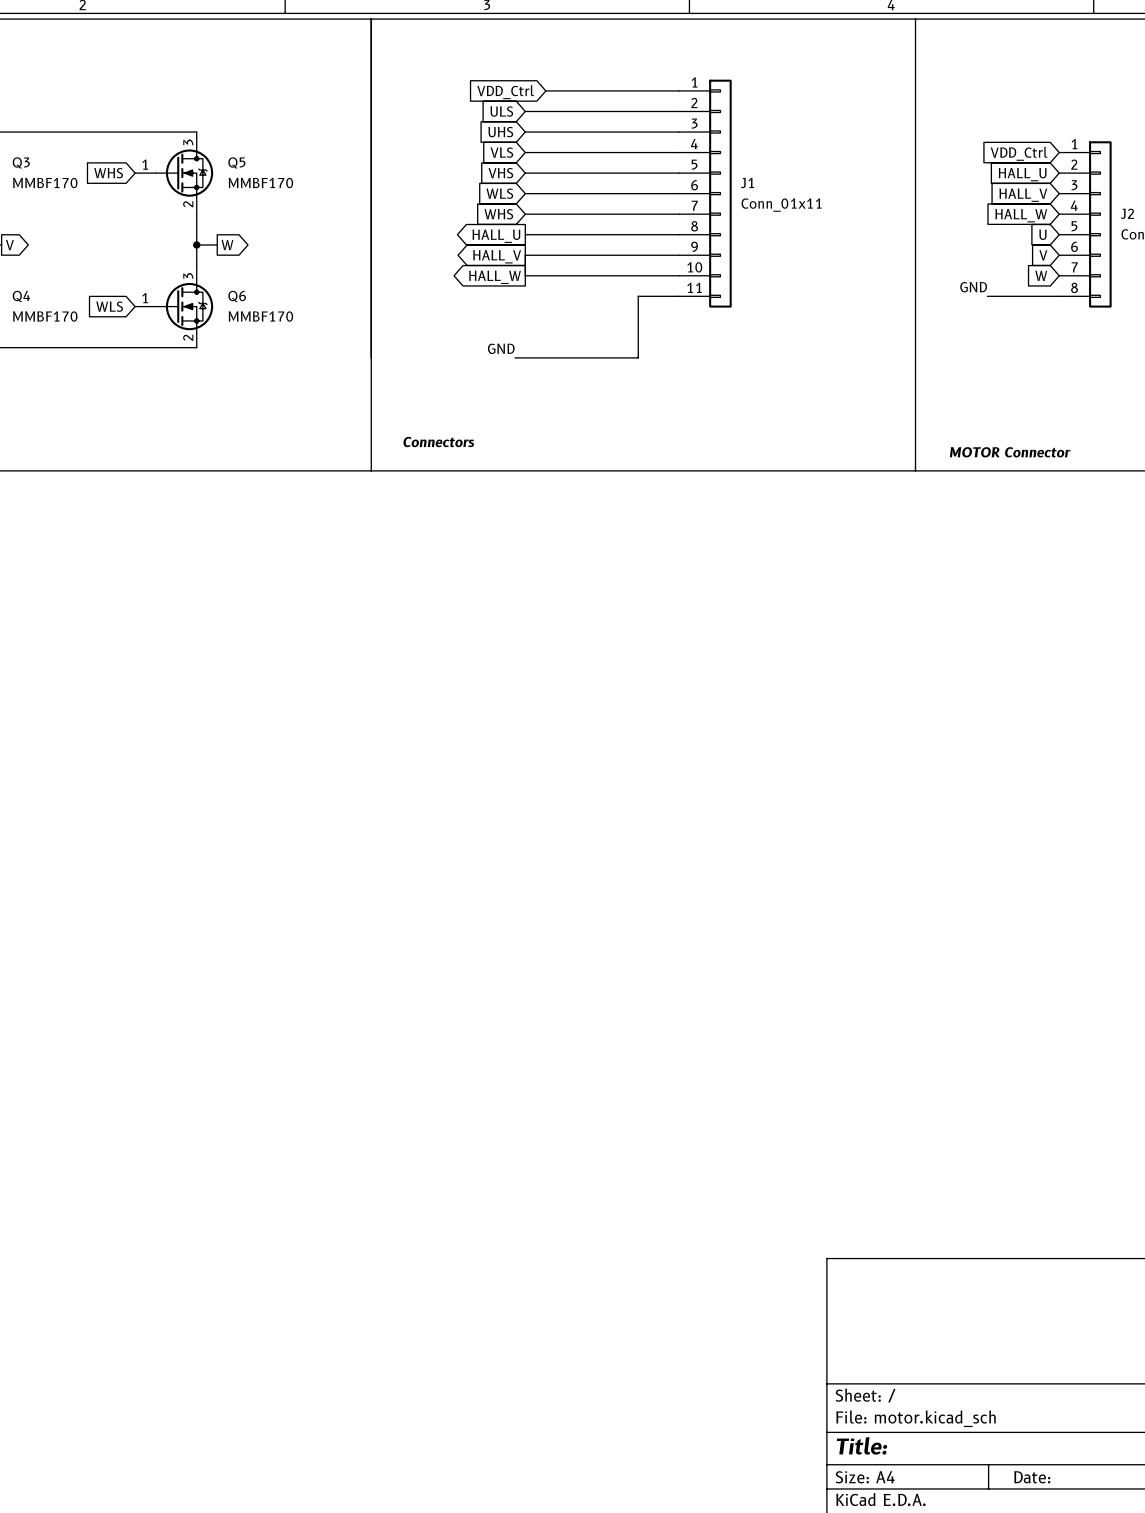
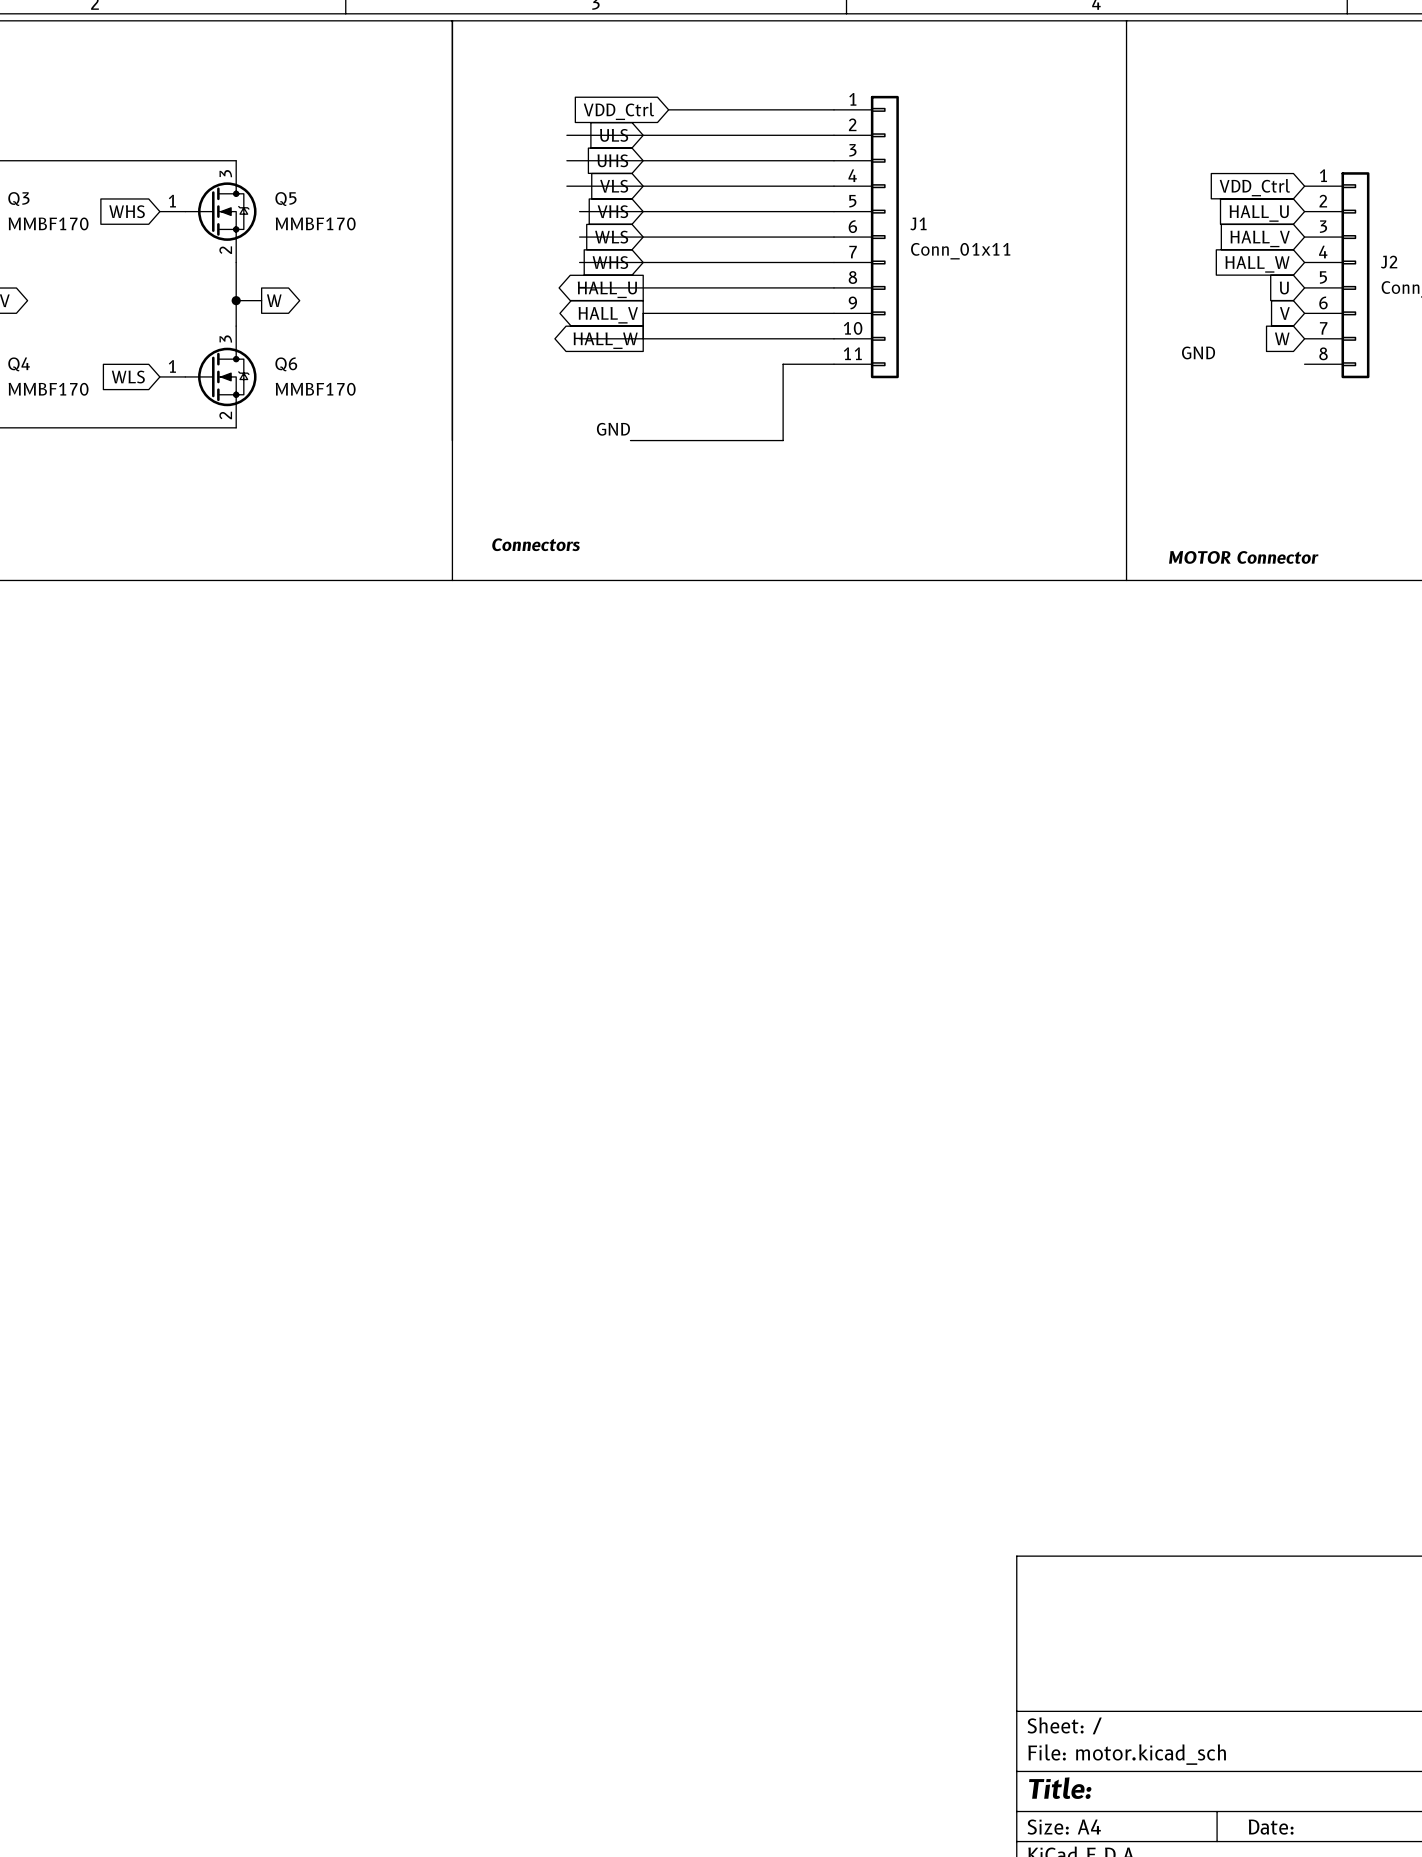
wire: none -> (566, 135) (643, 135)
wire: none -> (566, 160) (643, 160)
wire: none -> (566, 186) (643, 186)
wire: none -> (579, 211) (643, 211)
wire: none -> (579, 237) (643, 237)
wire: none -> (579, 262) (643, 262)
wire: none -> (579, 287) (643, 287)
wire: none -> (579, 338) (643, 338)
wire: (987, 296) (1059, 296) -> none

